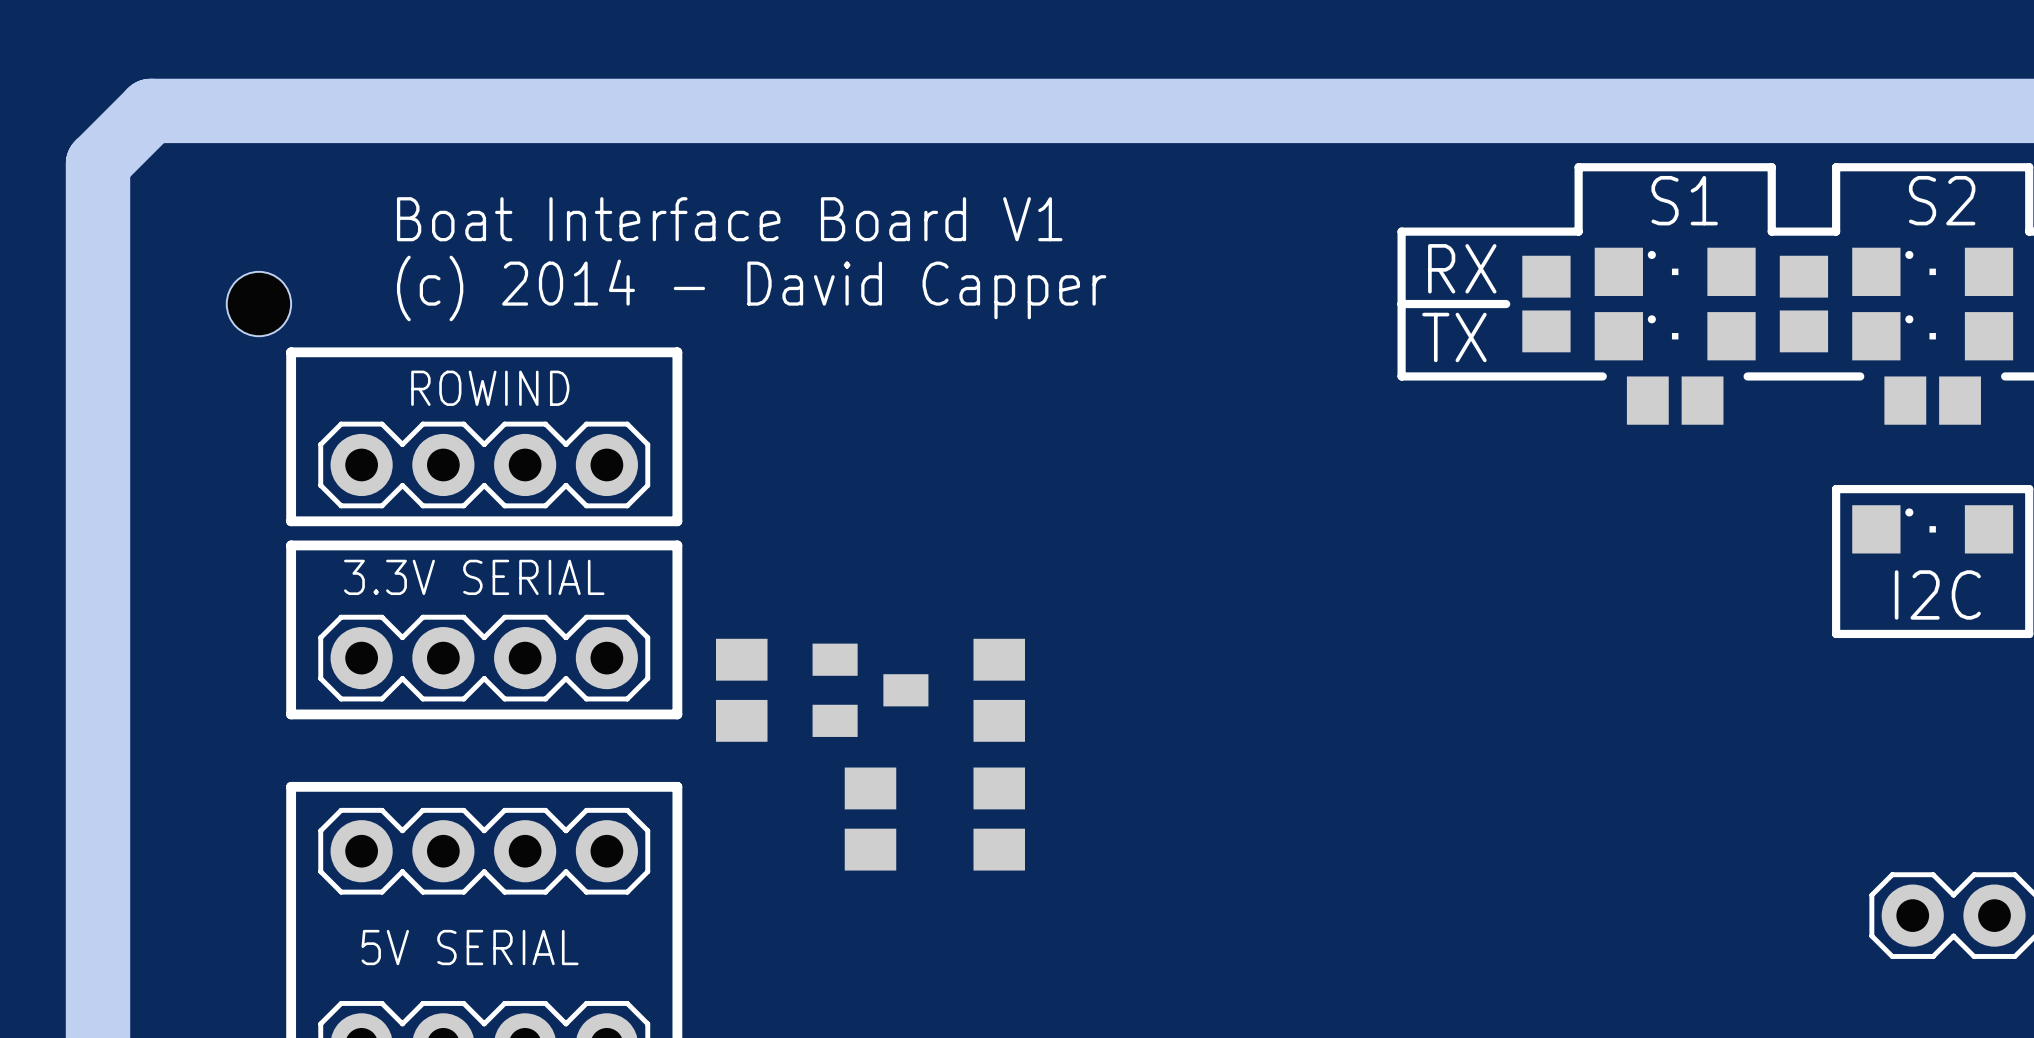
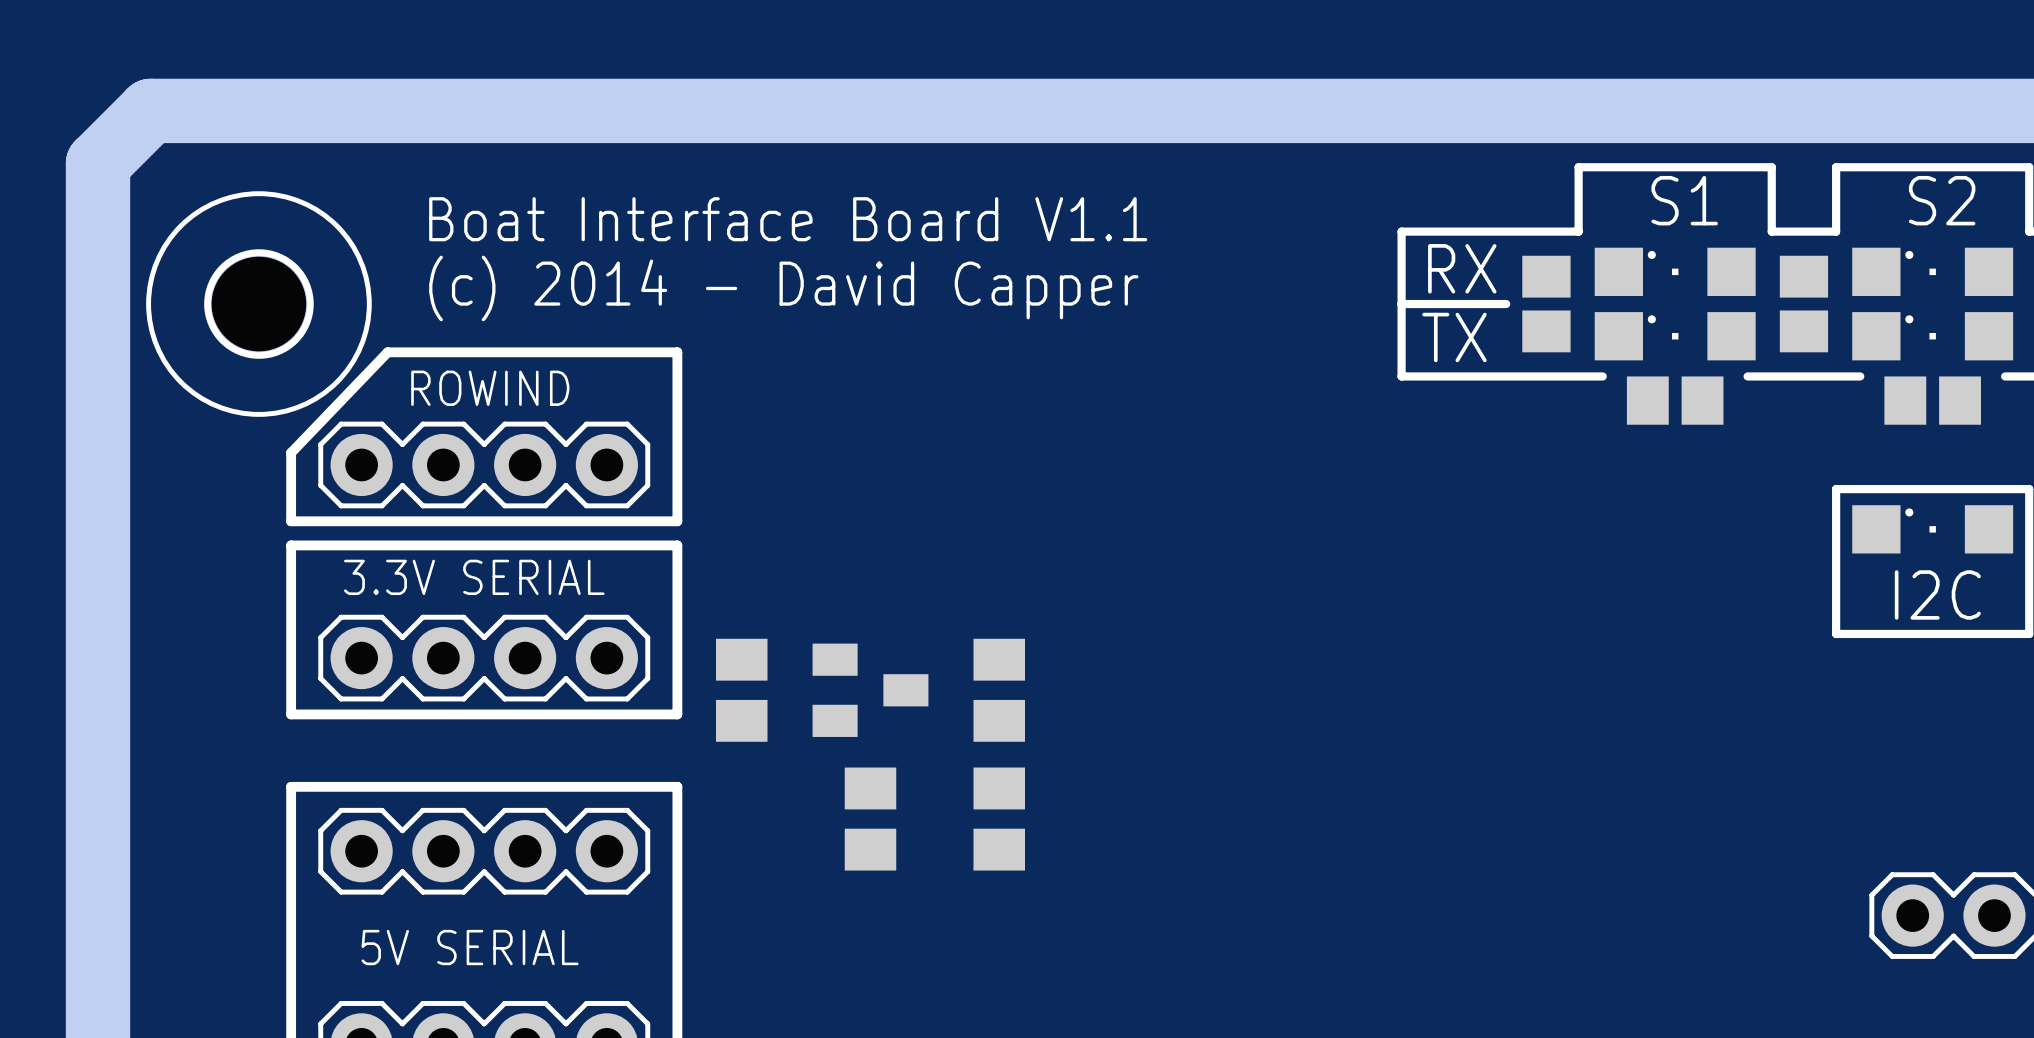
text: Boat Interface Board V1 (729, 219) -> Boat Interface Board V1.1 (788, 219)
text position: (c) 2014 - David Capper (751, 288) -> (c) 2014 - David Capper (783, 288)
hole: (258, 304) -> none
part: none -> (258, 304)
line: (387, 352) (291, 352) (291, 452) -> (387, 352) (291, 452)

